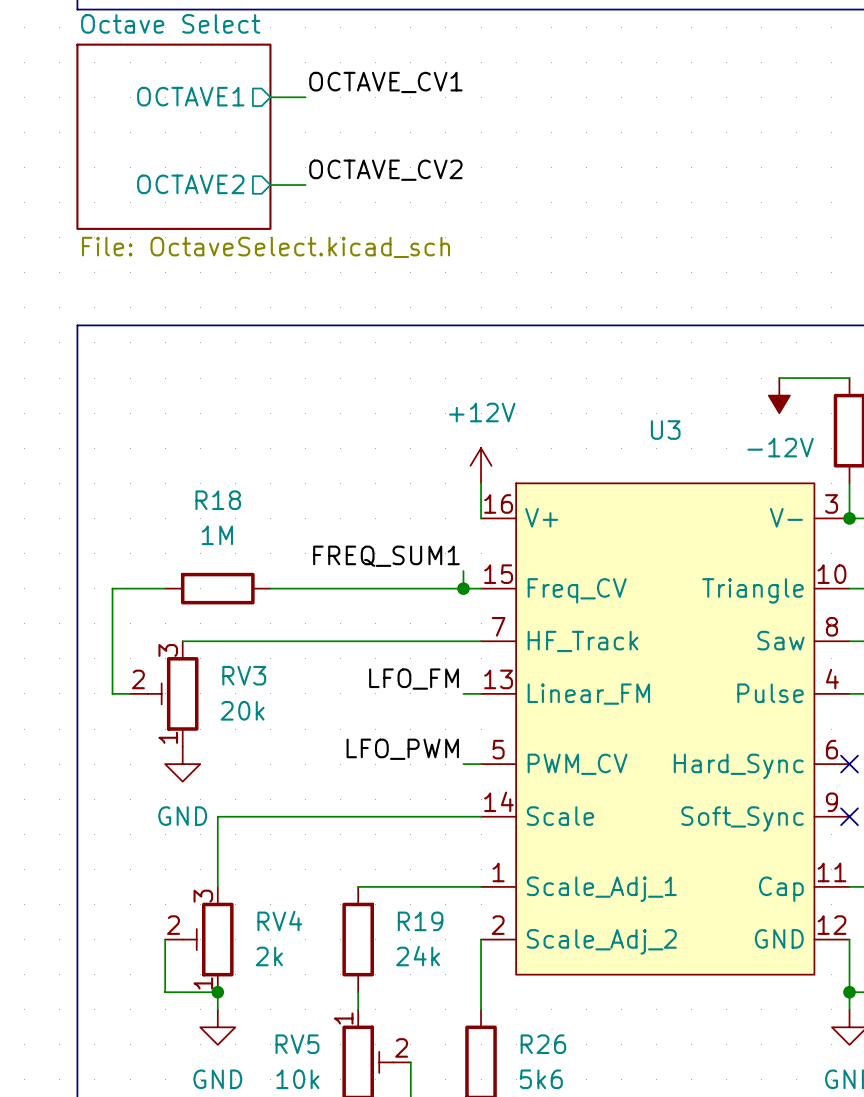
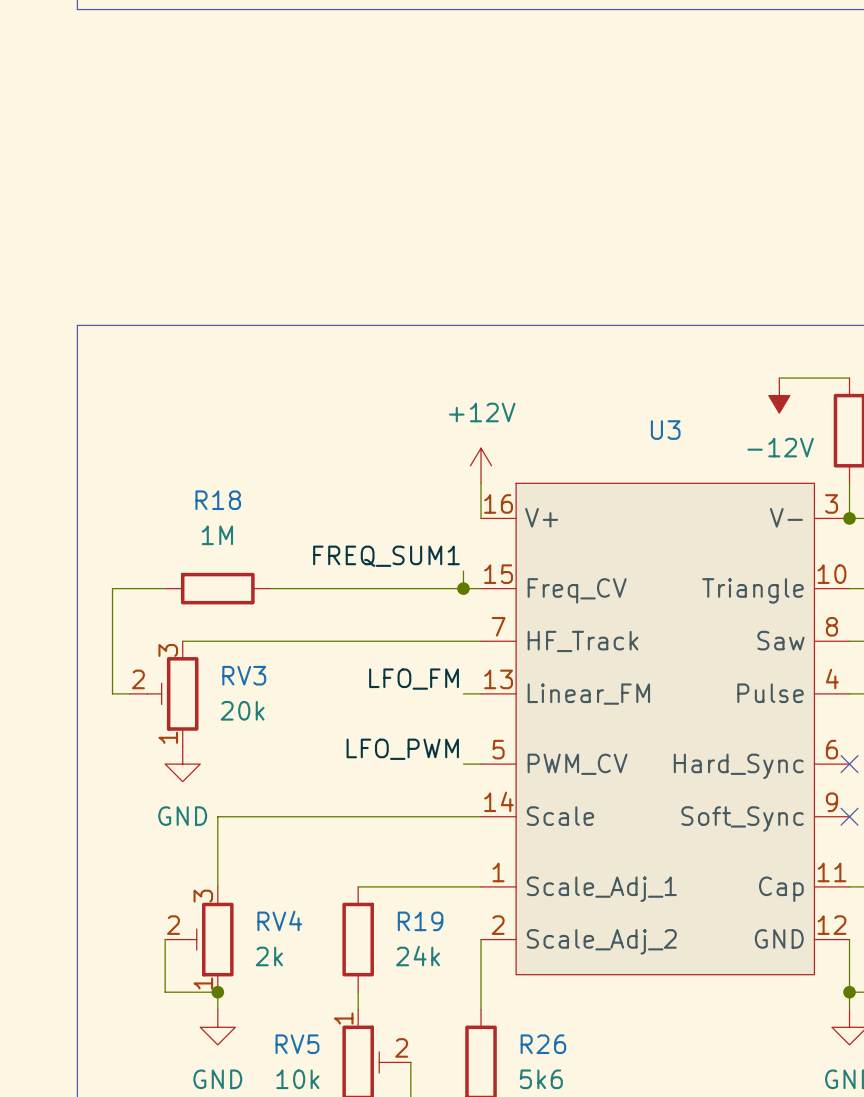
label: OCTAVE_CV1 (385, 82) -> none
sheet pin: OCTAVE1 (190, 96) -> none
wire: (270, 97) (305, 97) -> none
sheet Octave Select: File: OctaveSelect.kicad_sch (173, 136) -> none
label: OCTAVE_CV2 (385, 170) -> none
sheet pin: OCTAVE2 (190, 184) -> none
wire: (270, 185) (305, 185) -> none

